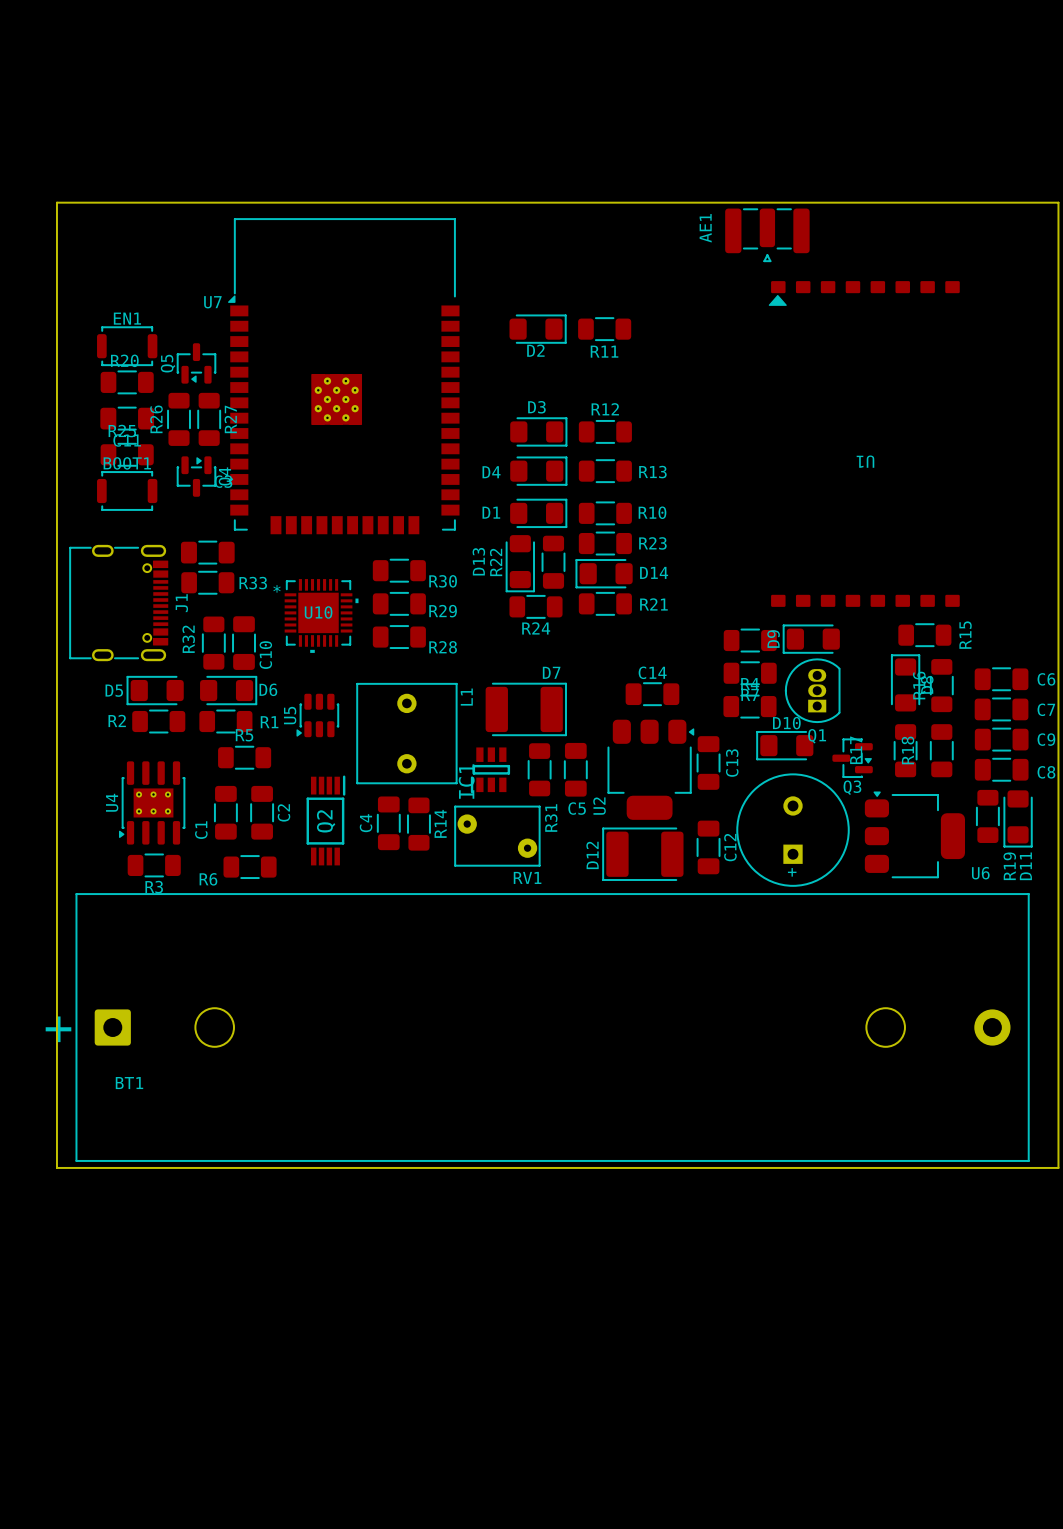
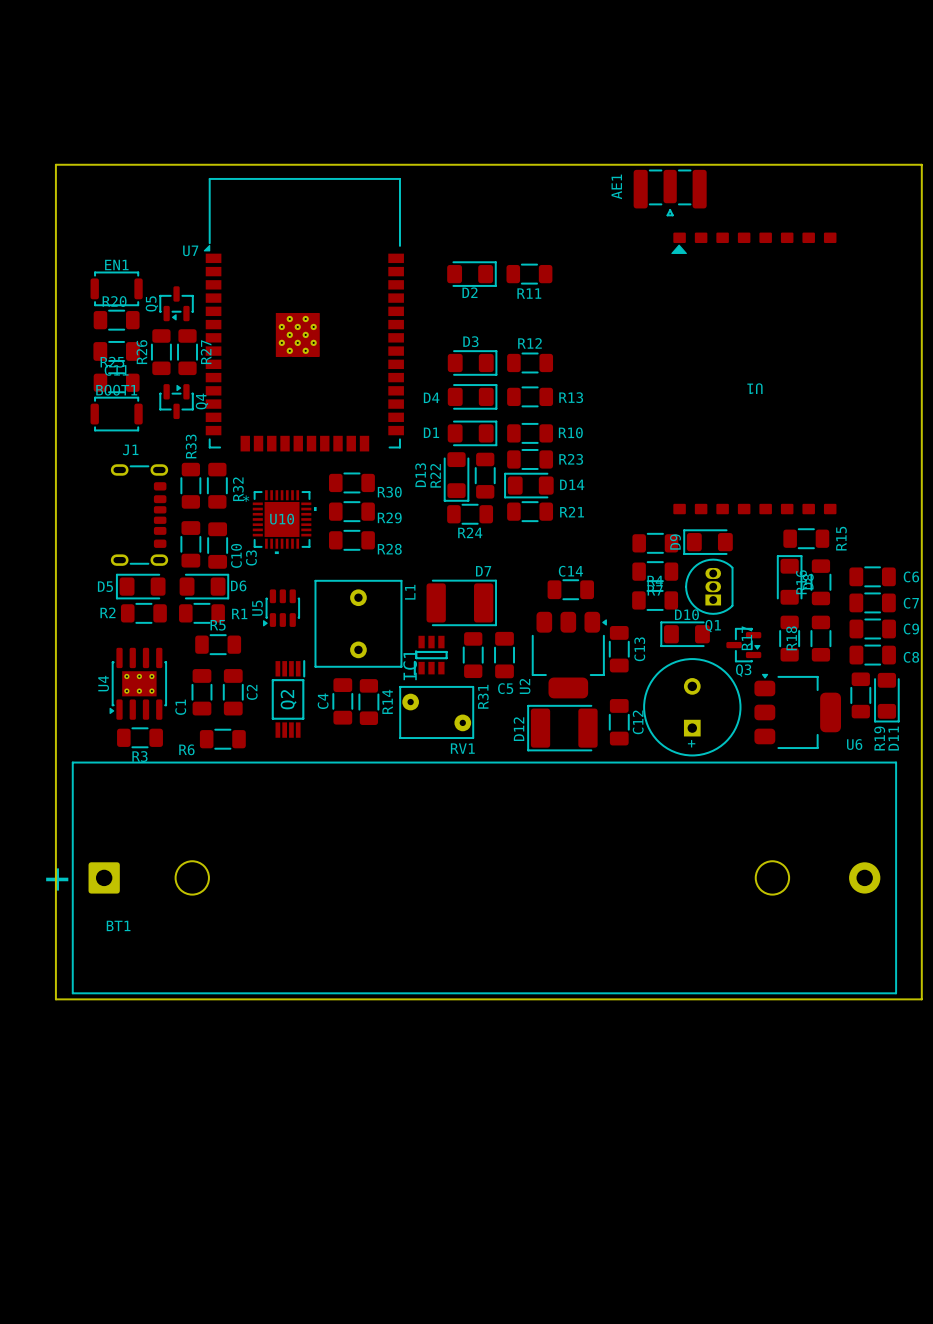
J1 footprint: [69, 544, 169, 662] -> [110, 464, 169, 566]
C3 rotation: 0° (207, 552) -> 90° clockwise (190, 544)
C3 position: (207, 552) -> (190, 544)
R33 rotation: 0° (207, 582) -> 90° clockwise (190, 485)
R33 name position: R33 (253, 583) -> R33 (191, 446)
J1 name position: J1 (181, 603) -> J1 (130, 449)
R32 name position: R32 (188, 639) -> R32 (238, 489)
R32 position: (213, 643) -> (217, 485)

